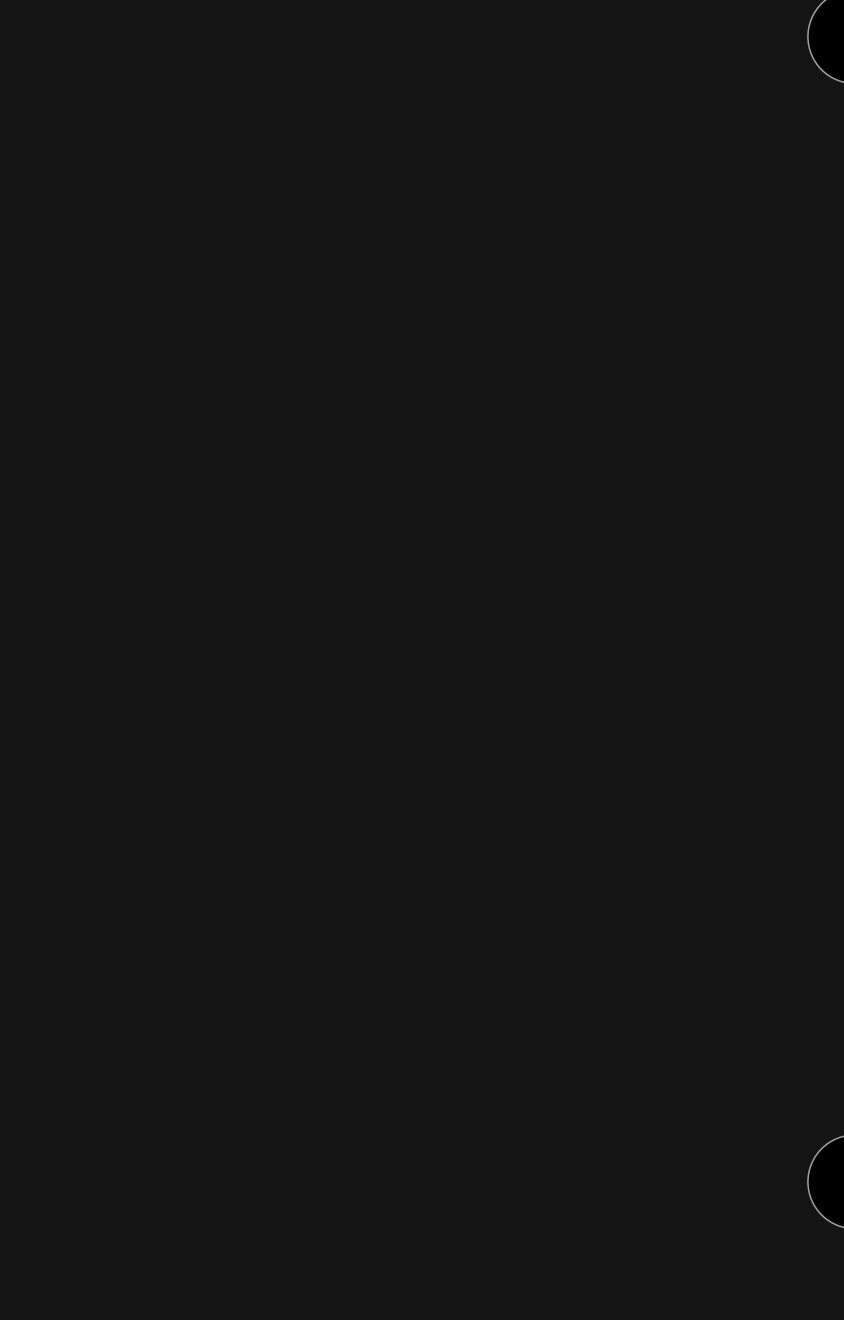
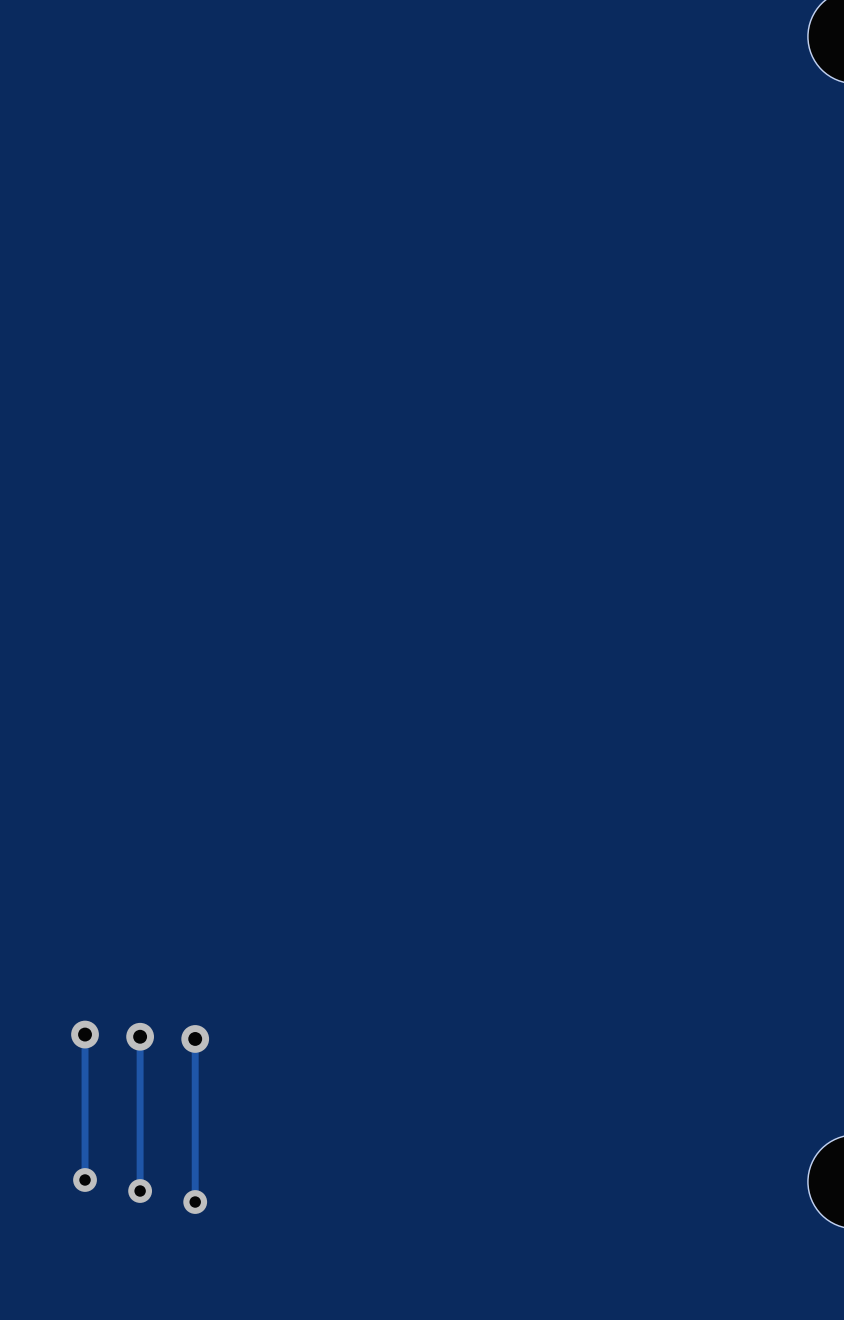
track: none -> (85, 1034) (85, 1179)
via: none -> (85, 1034)
track: none -> (140, 1036) (140, 1191)
via: none -> (140, 1036)
track: none -> (195, 1038) (195, 1193)
via: none -> (195, 1038)
via: none -> (85, 1179)
via: none -> (140, 1191)
via: none -> (195, 1202)

